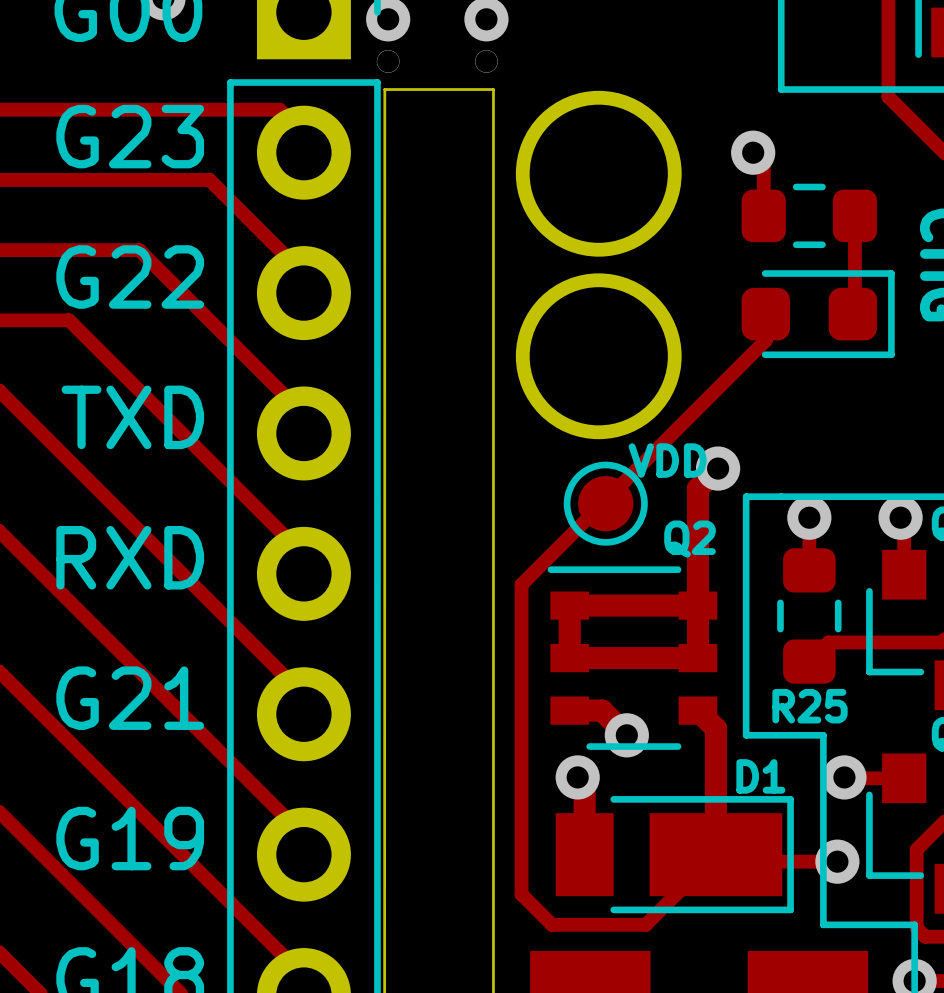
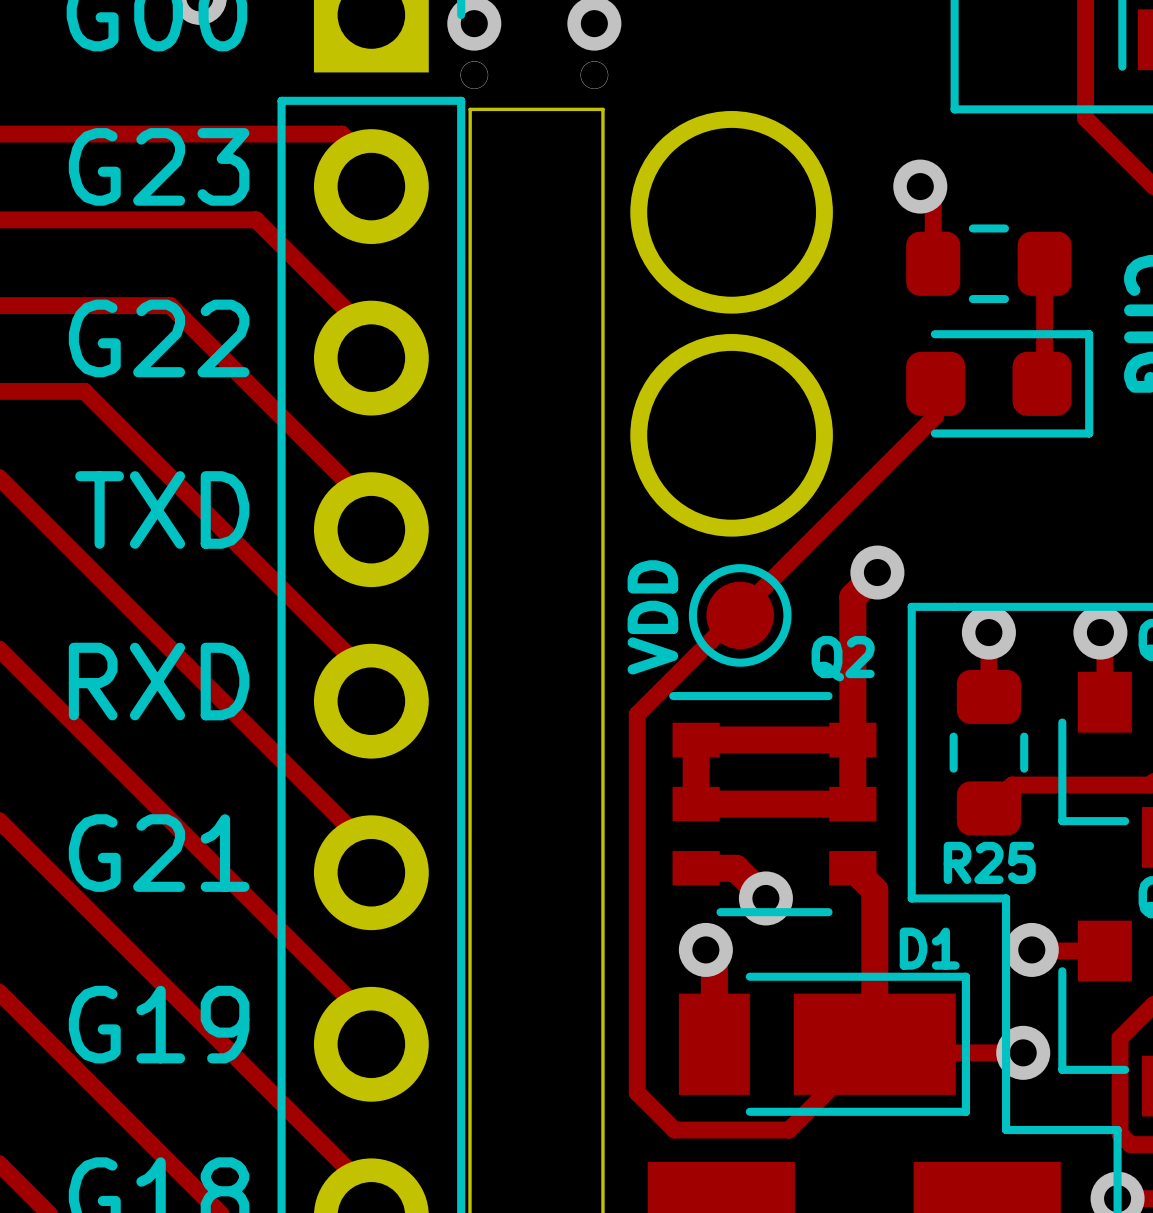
VDD name rotation: 0° (667, 460) -> 90° counterclockwise (652, 617)
VDD name position: VDD (667, 460) -> VDD (652, 617)

